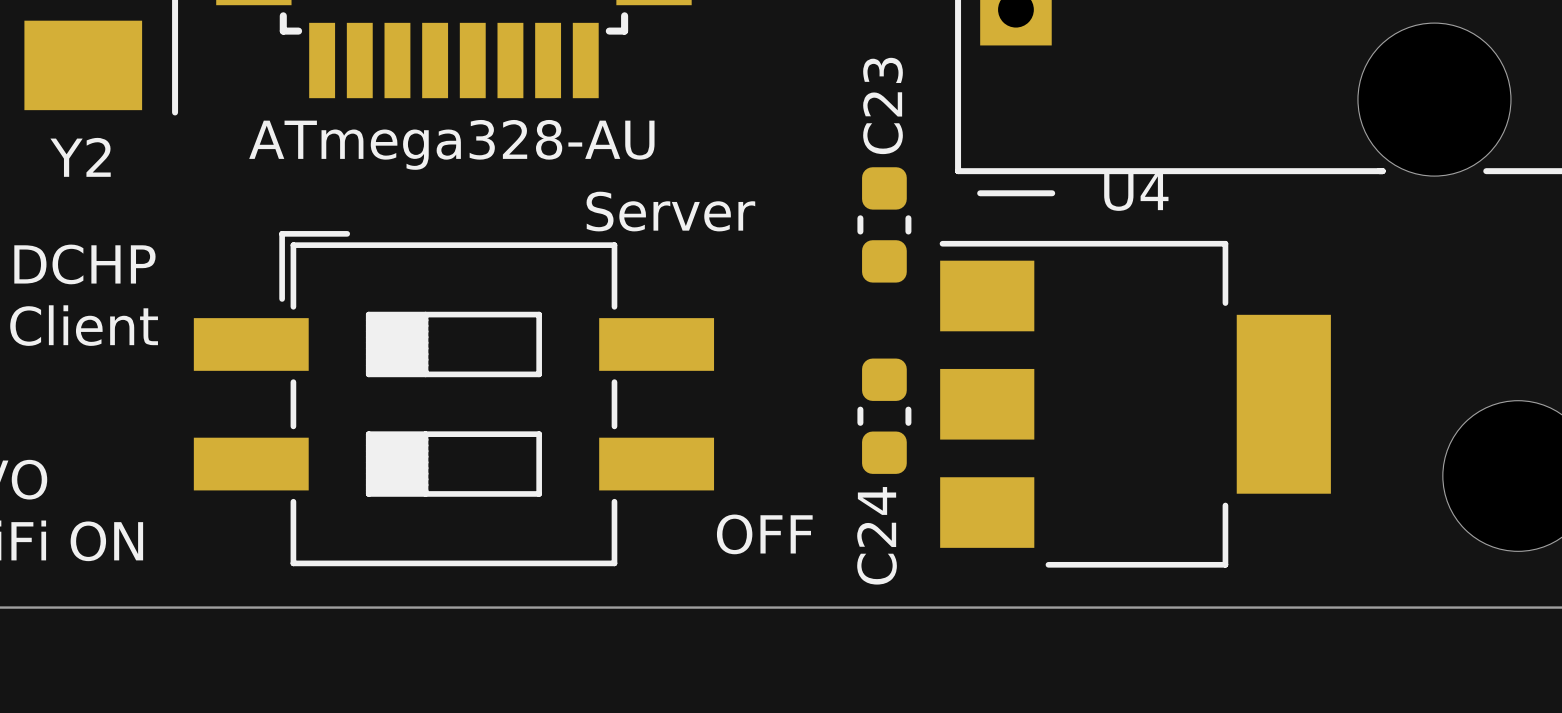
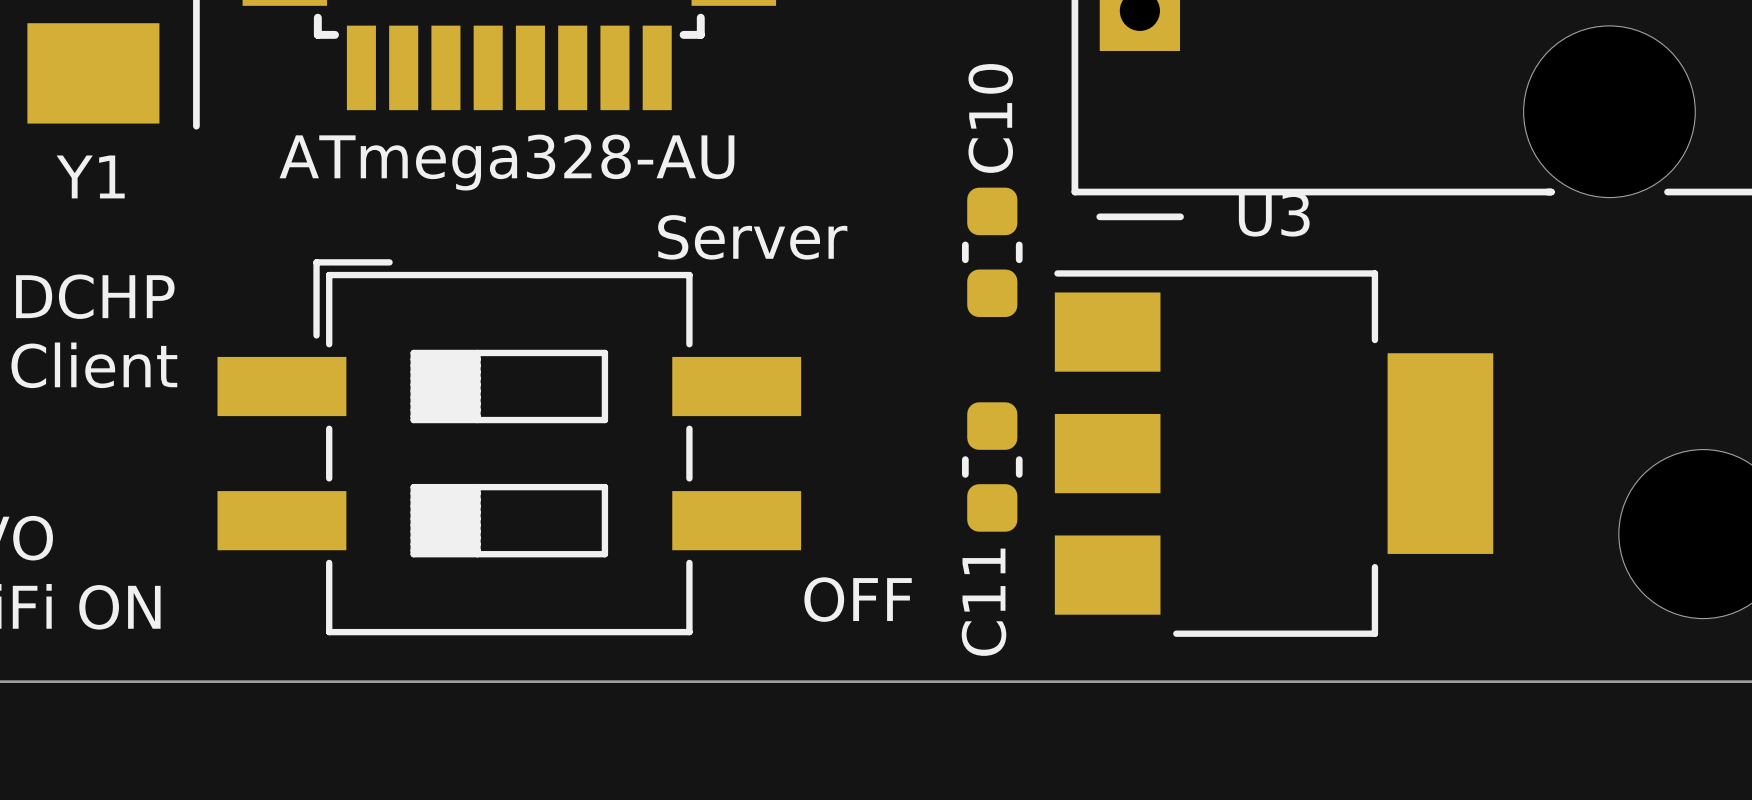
C23 name: C23 (883, 105) -> C10 (990, 118)
Y2 name: Y2 (80, 157) -> Y1 (90, 176)
U4 name: U4 (1136, 191) -> U3 (1274, 214)
C24 name: C24 (877, 535) -> C11 (984, 602)

